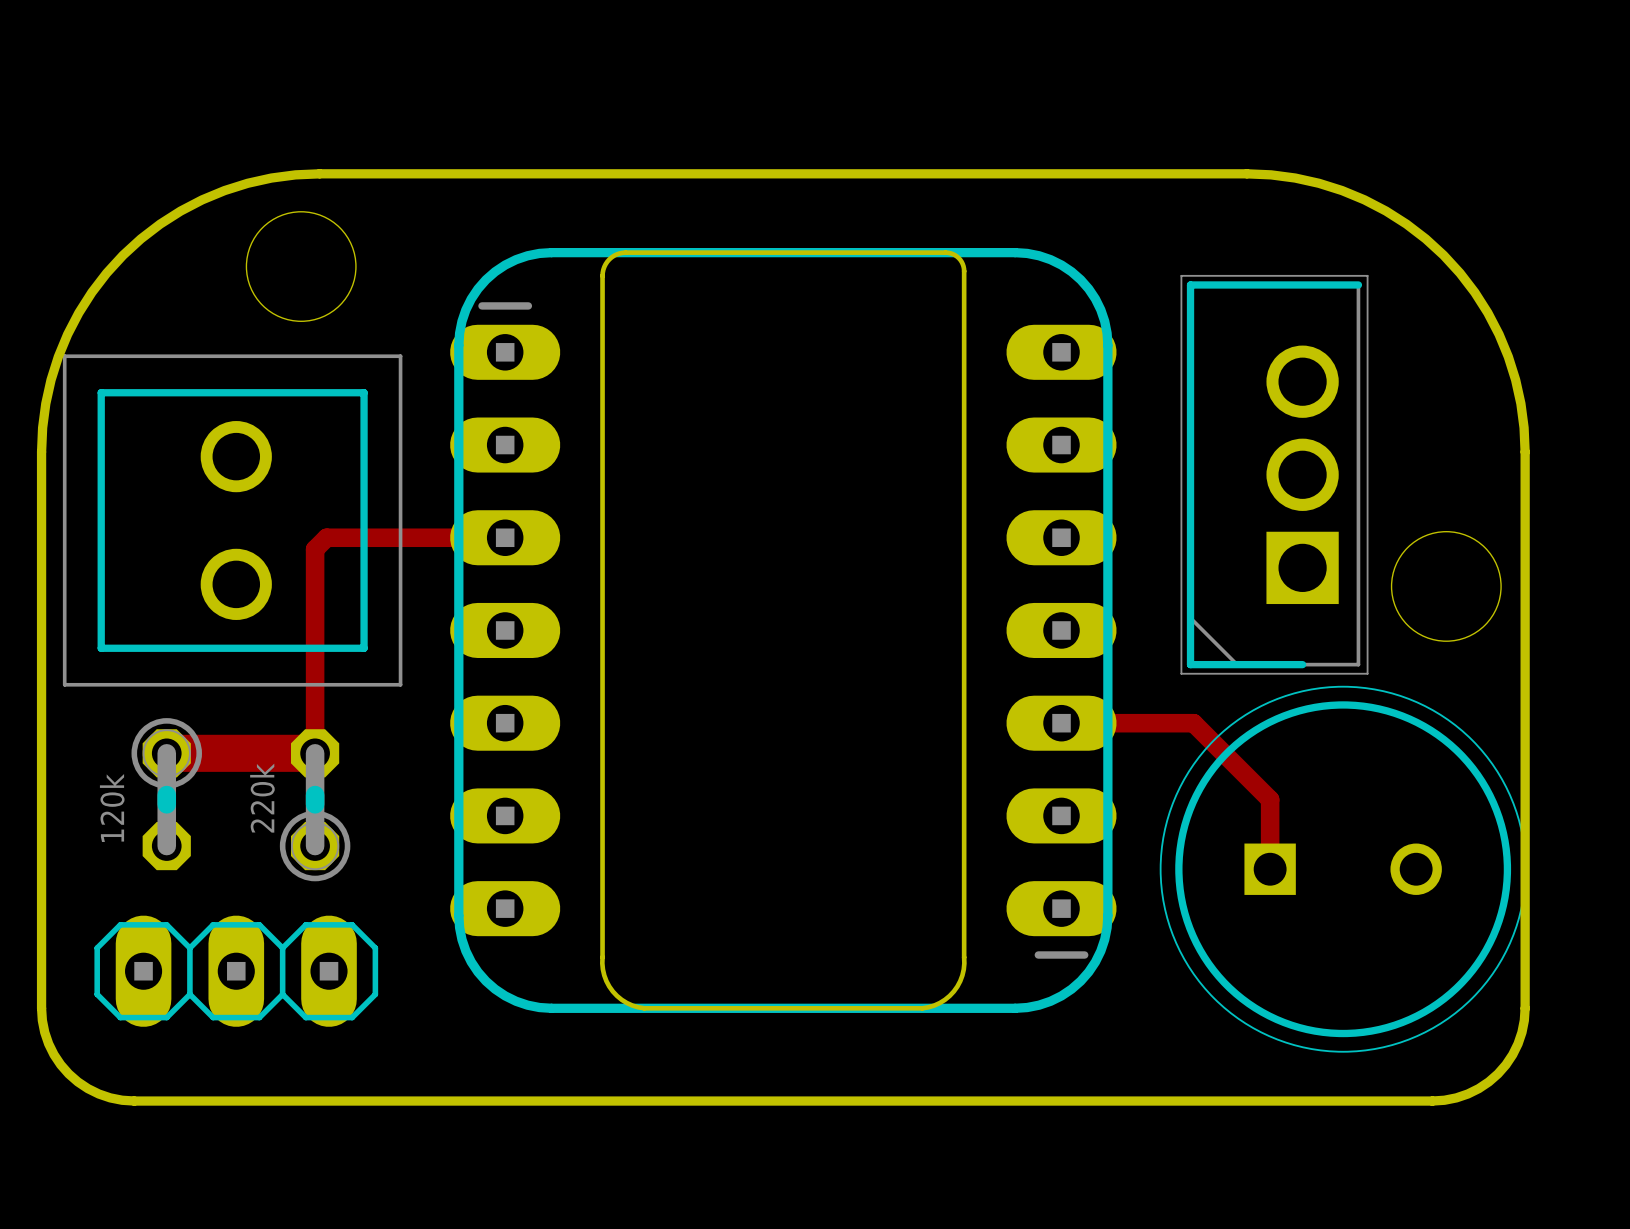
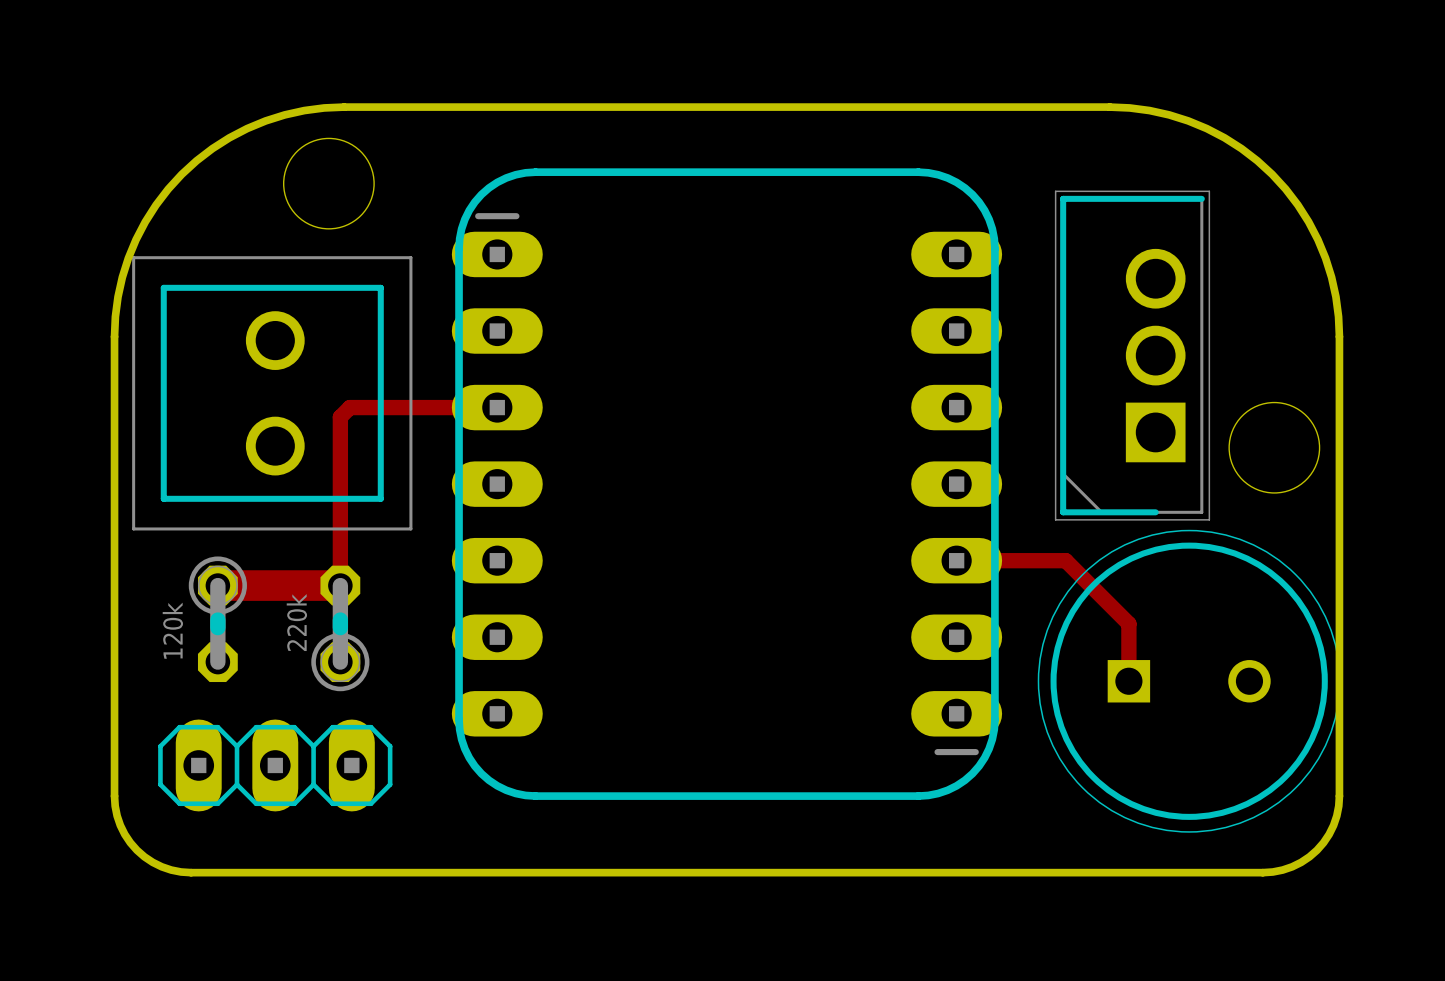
board edge: (625, 252) (945, 252) (956, 256) (962, 264) (964, 963) (962, 975) (957, 986) (944, 999) (934, 1005) (922, 1008) (644, 1008) (632, 1005) (621, 999) (612, 991) (606, 981) (602, 963) (602, 275) (604, 266) (609, 259) (616, 254) (625, 252) -> none

